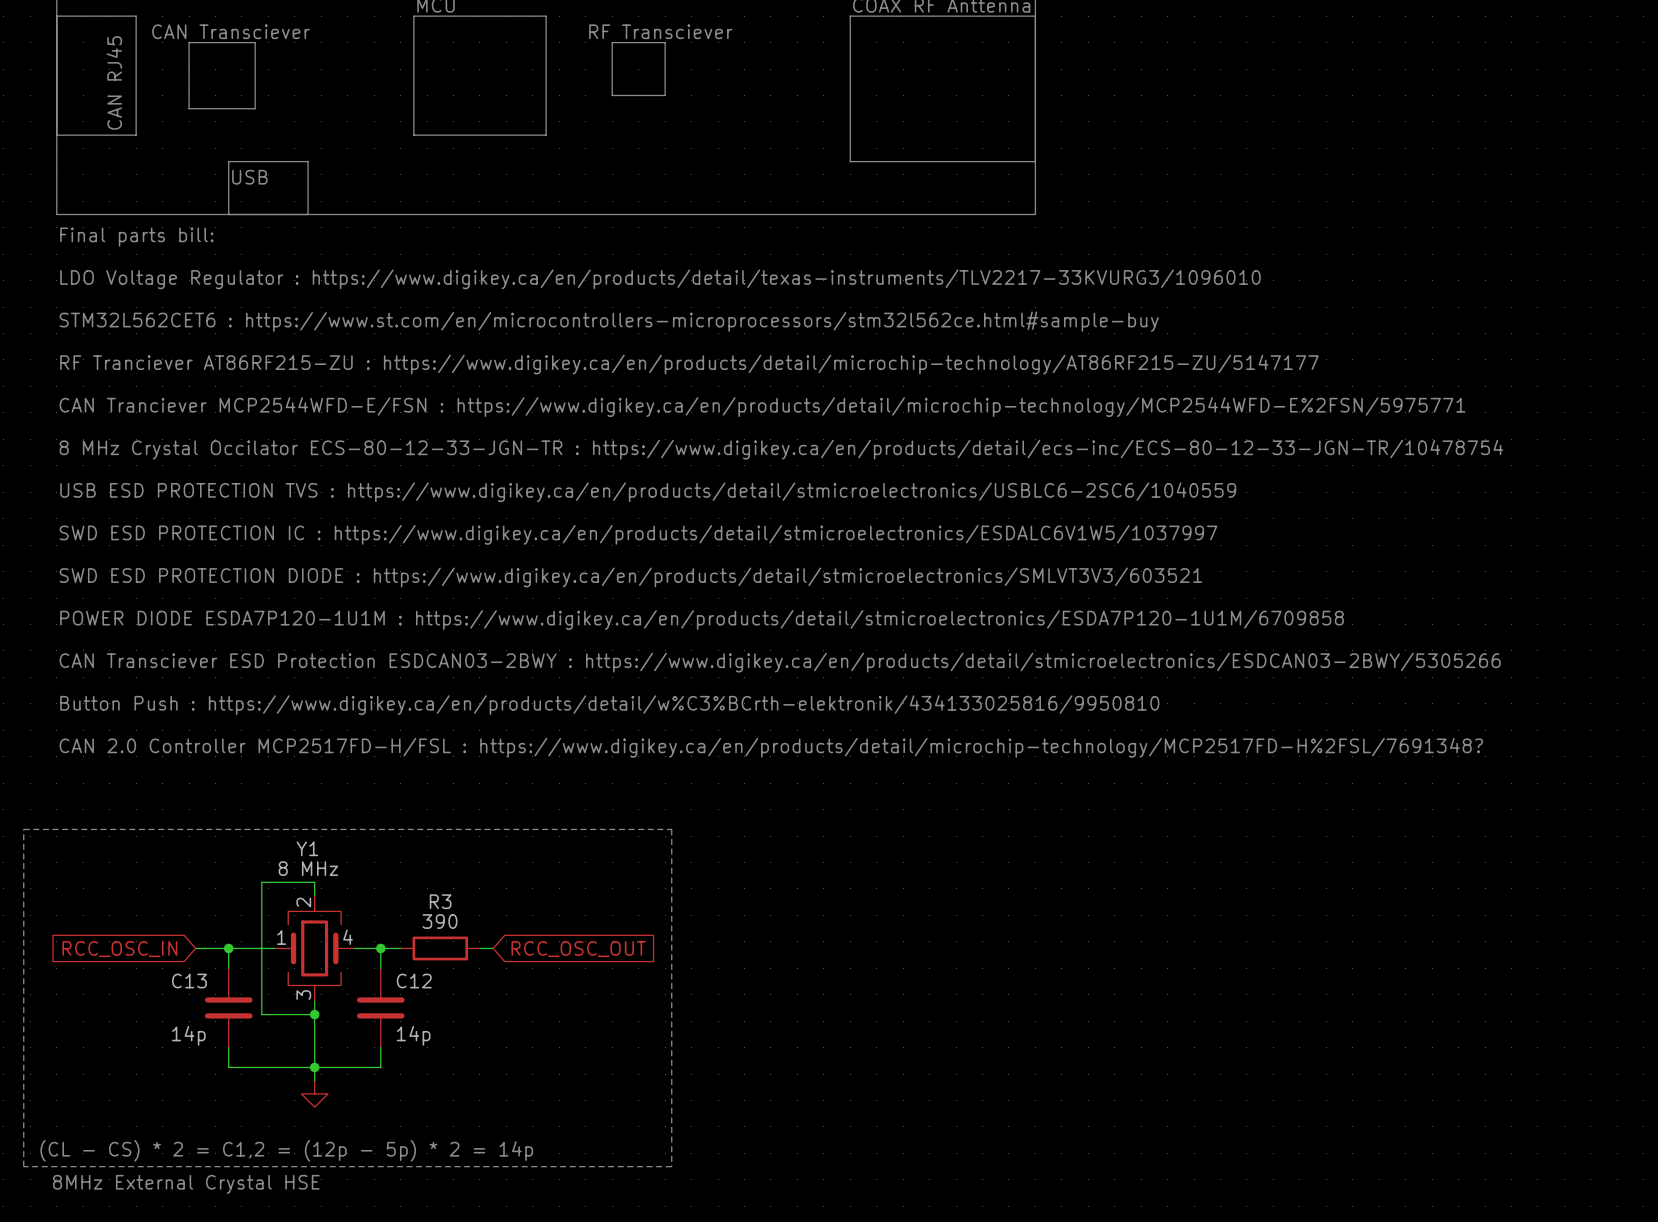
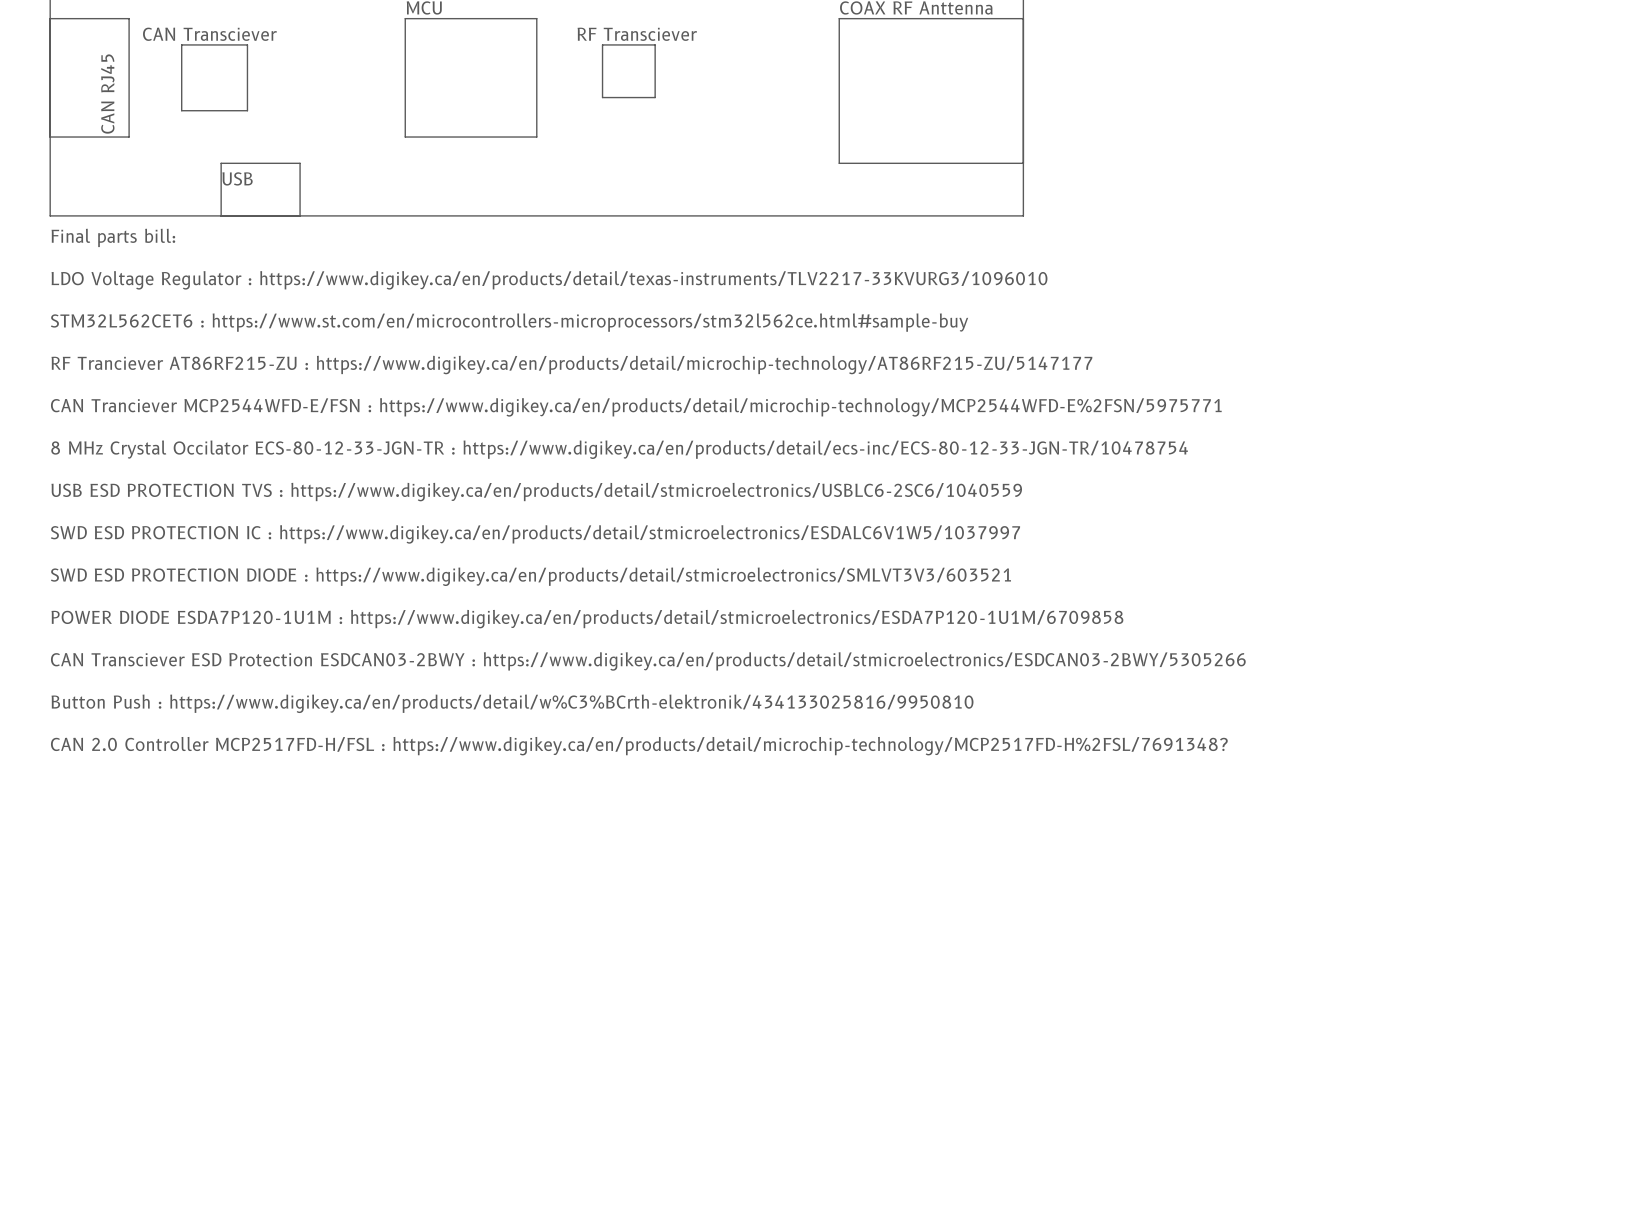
line: (23, 829) (671, 829) (671, 1166) (23, 1166) (23, 829) -> none
wire: (314, 895) (314, 882) (261, 882) (261, 1014) (314, 1014) -> none
wire: (195, 948) (275, 948) -> none
wire: (228, 948) (228, 968) -> none
junction: (228, 948) -> none
Y1: 8 MHz (314, 948) -> none
wire: (354, 948) (400, 948) -> none
wire: (380, 948) (380, 968) -> none
junction: (380, 948) -> none
R3: 390 (440, 948) -> none
wire: (479, 948) (493, 948) -> none
global label: RCC_OSC_IN (119, 949) -> none
global label: RCC_OSC_OUT (578, 949) -> none
wire: (314, 1001) (314, 1080) -> none
C13: 14p (228, 1007) -> none
C12: 14p (380, 1007) -> none
junction: (314, 1014) -> none
wire: (228, 1047) (228, 1067) (380, 1067) (380, 1047) -> none
junction: (314, 1067) -> none
power symbol: (314, 1093) -> none
text: (CL - CS) * 2 = C1,2 = (12p - 5p) * 2 = 14p (286, 1150) -> none
text: 8MHz External Crystal HSE (186, 1184) -> none

